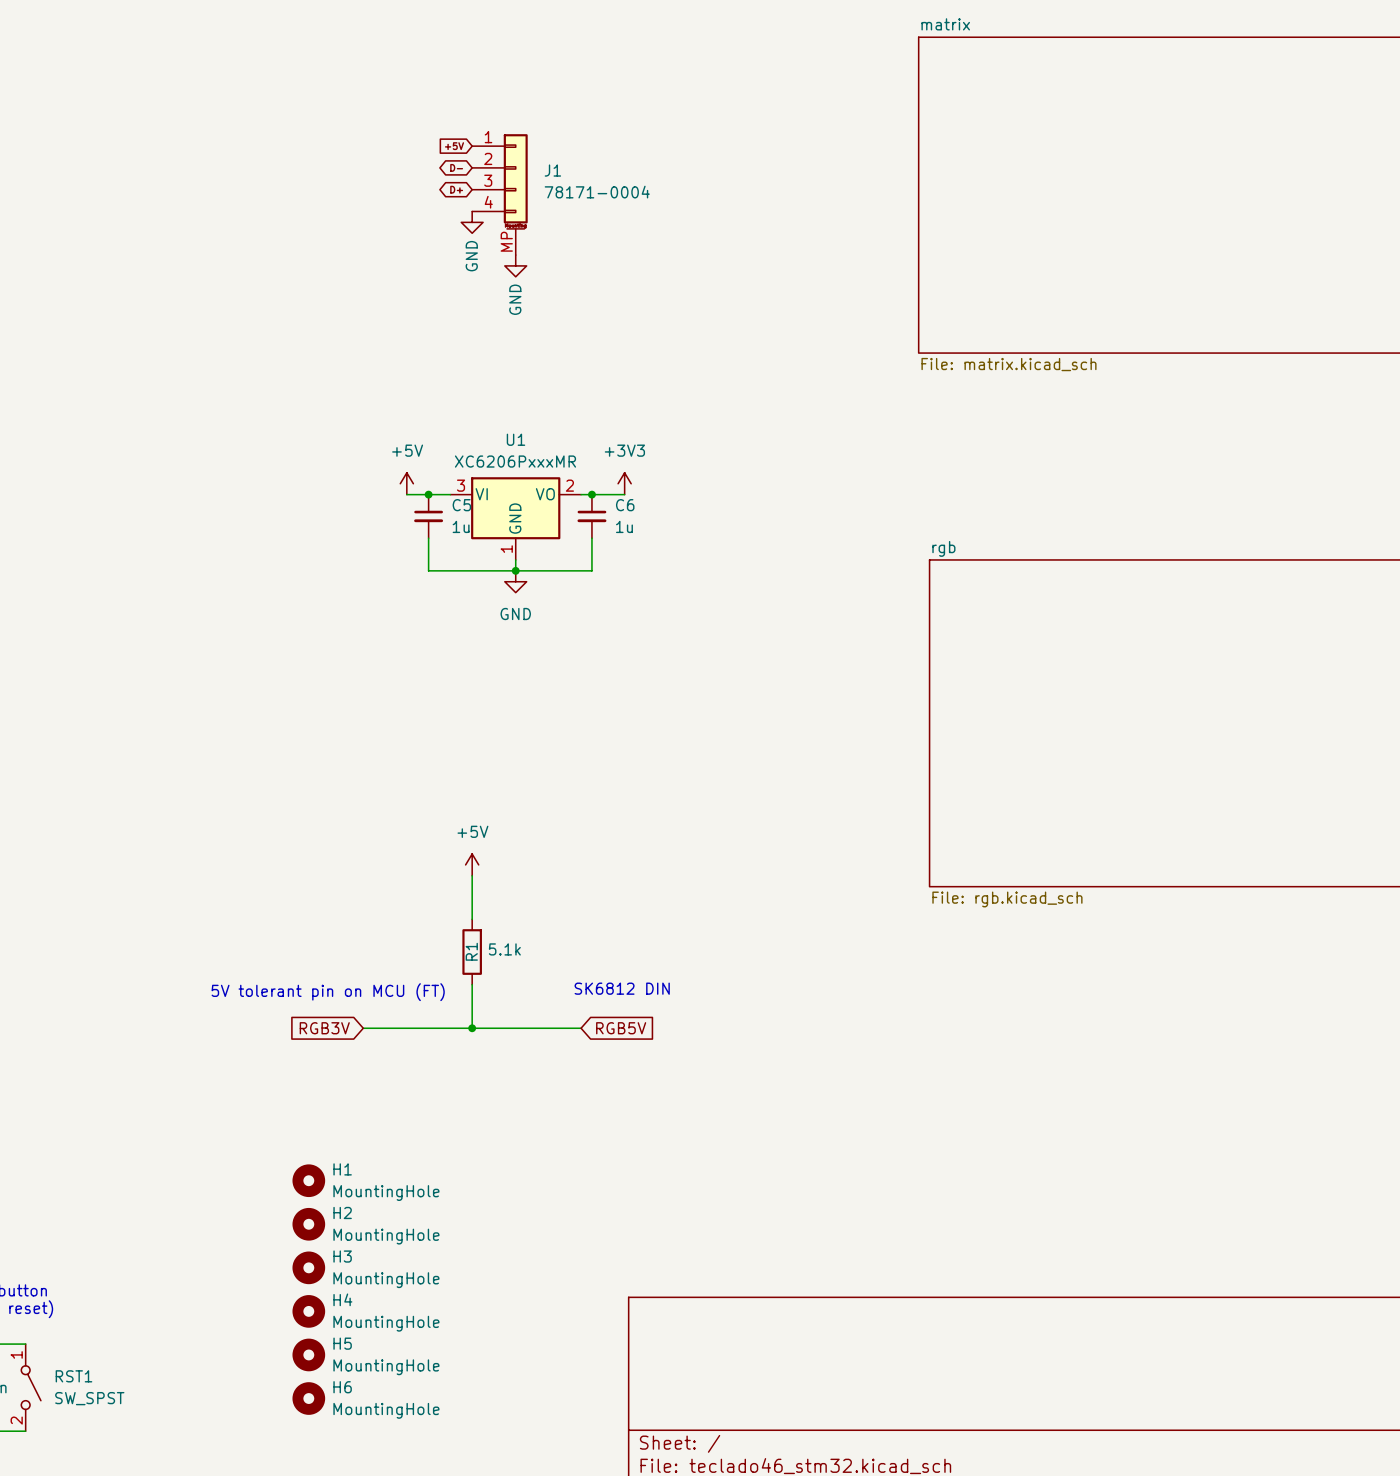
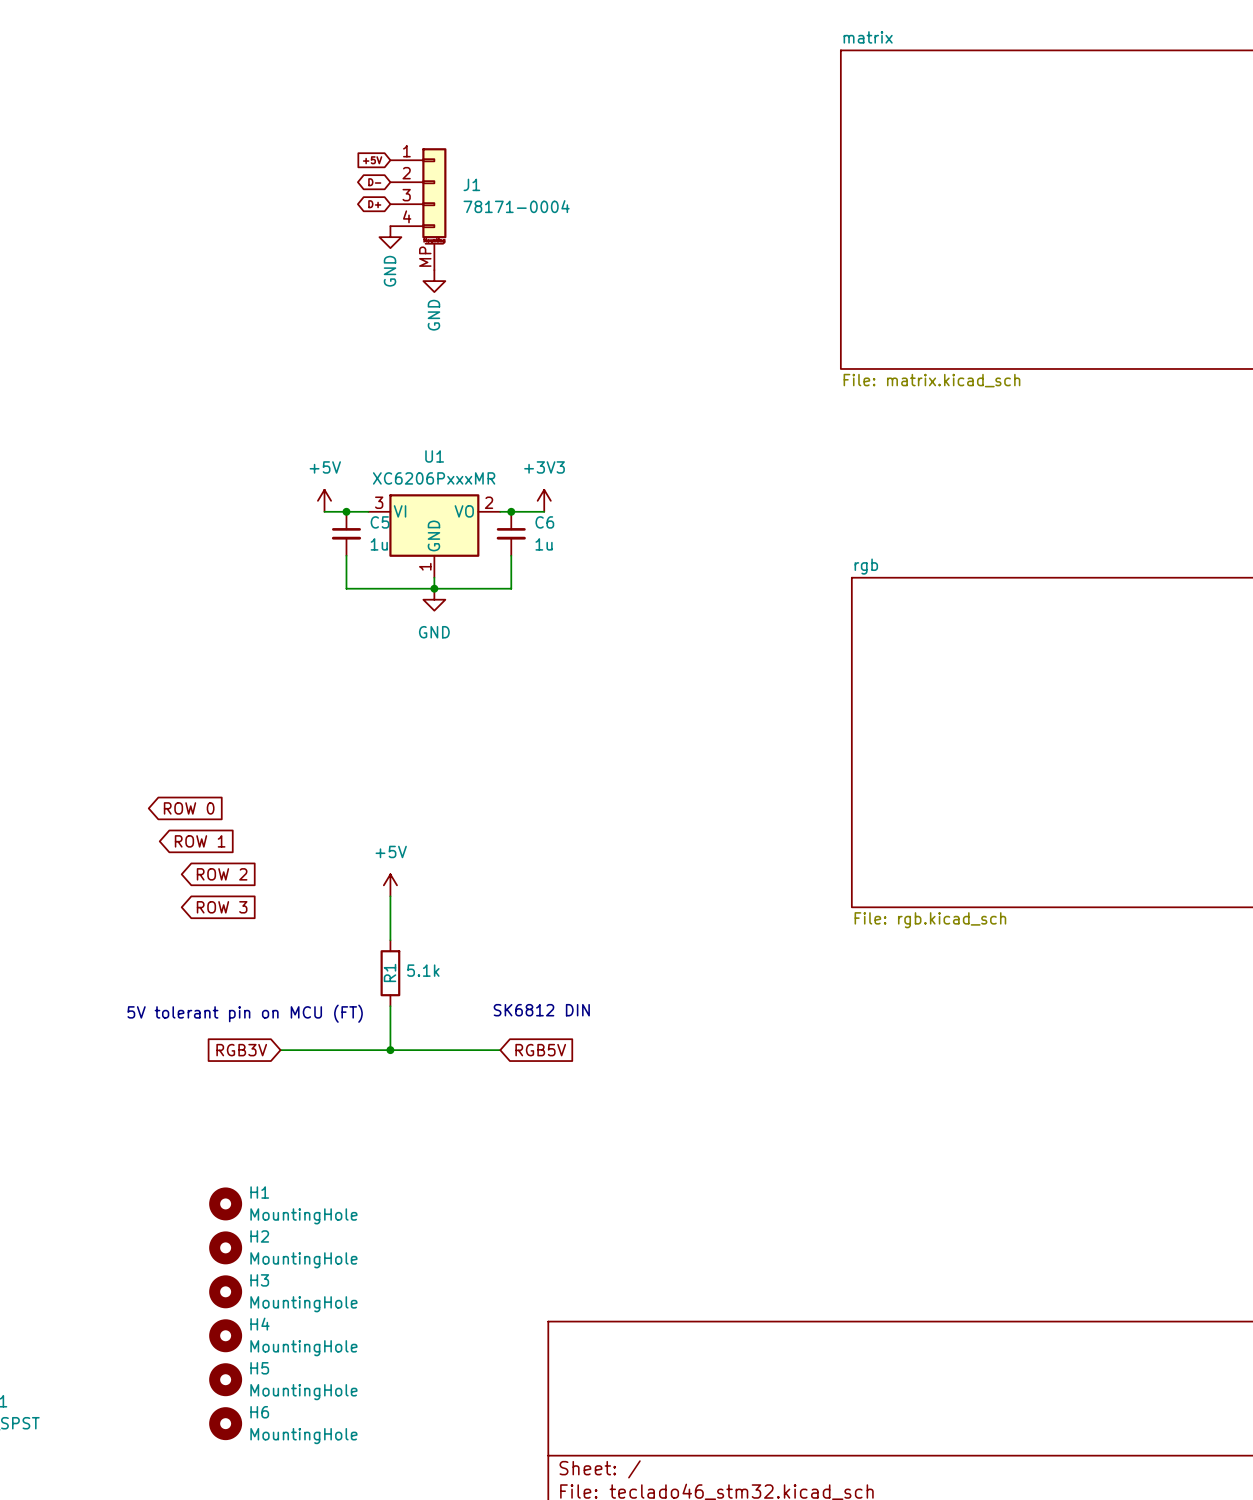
global label: none -> ROW 0 (189, 808)
global label: none -> ROW 1 (200, 841)
global label: none -> ROW 2 (222, 874)
global label: none -> ROW 3 (222, 907)

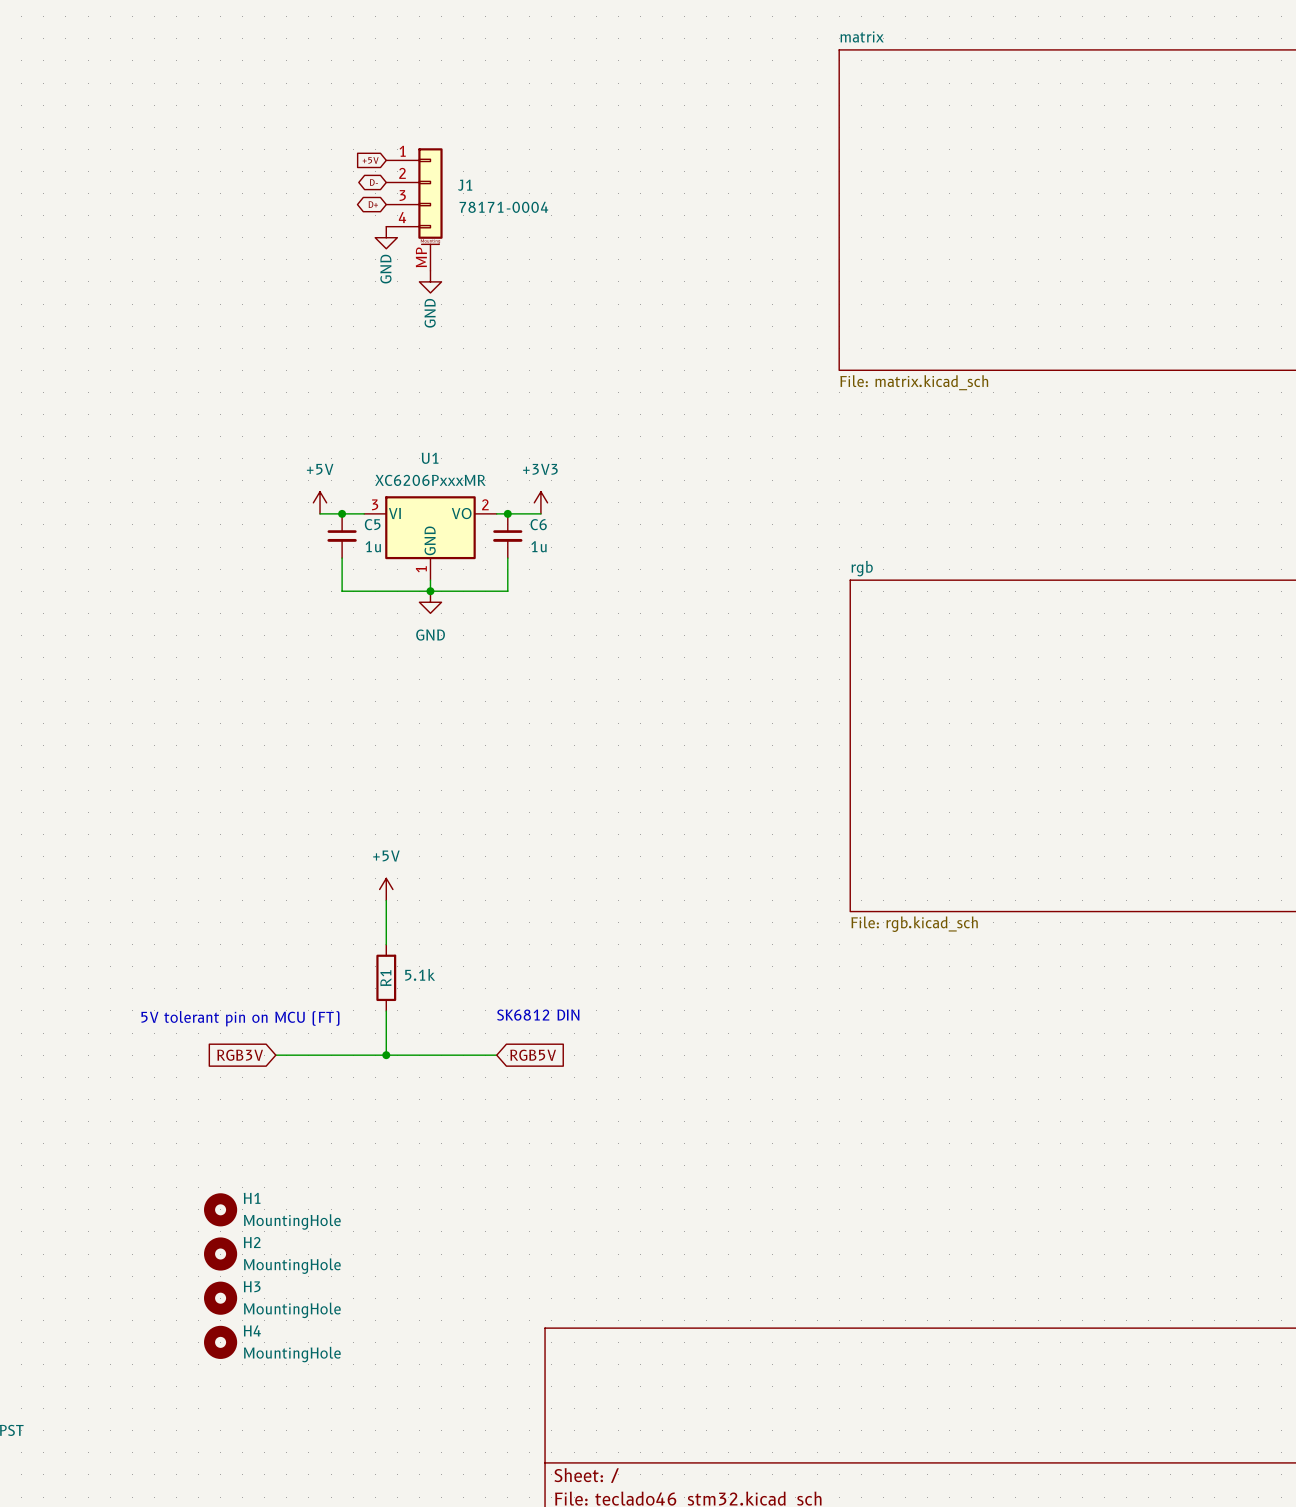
global label: ROW 0 (189, 808) -> none
global label: ROW 1 (200, 841) -> none
global label: ROW 2 (222, 874) -> none
global label: ROW 3 (222, 907) -> none
H5: MountingHole (225, 1379) -> none
H6: MountingHole (225, 1423) -> none

